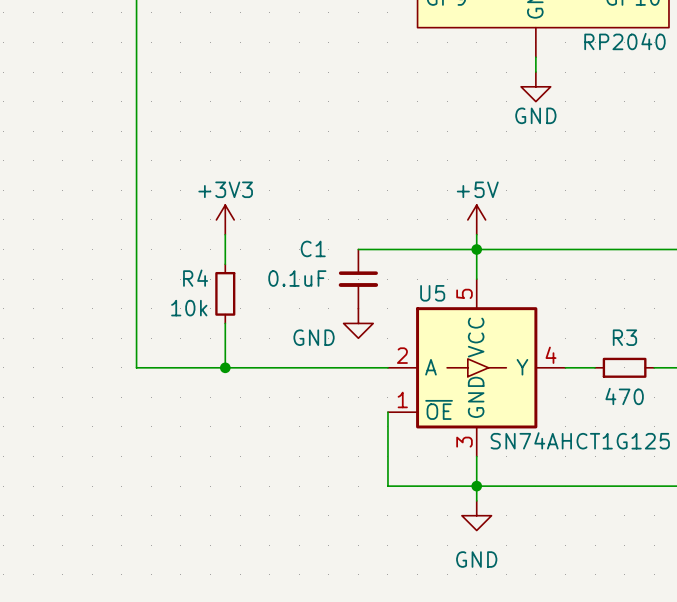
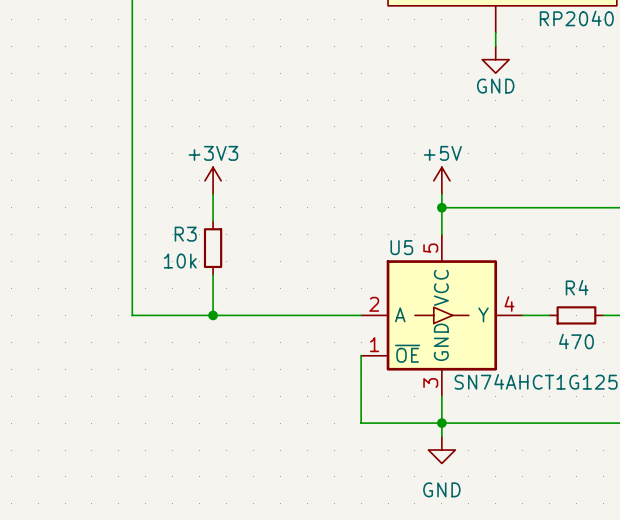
wire: (358, 249) (476, 249) -> none
R4 name: R4 (195, 278) -> R3 (185, 234)
C1: 0.1uF (358, 279) -> none
power symbol: GND (358, 323) -> none
R3 name: R3 (624, 337) -> R4 (577, 287)

